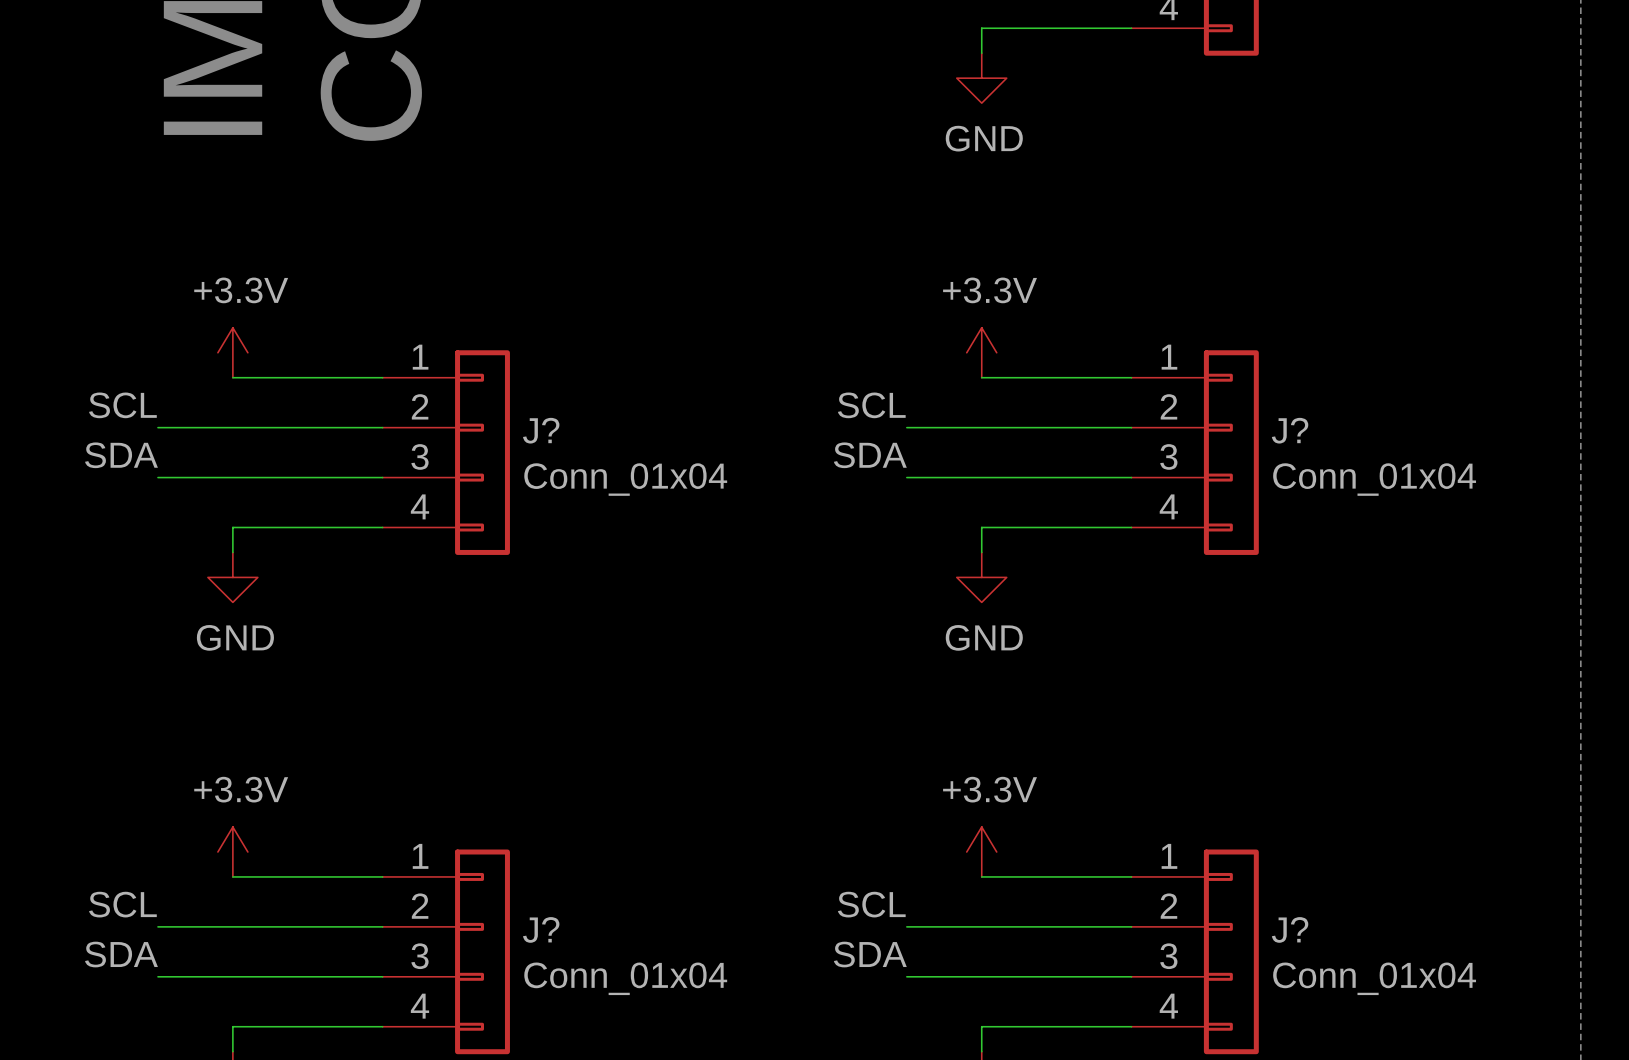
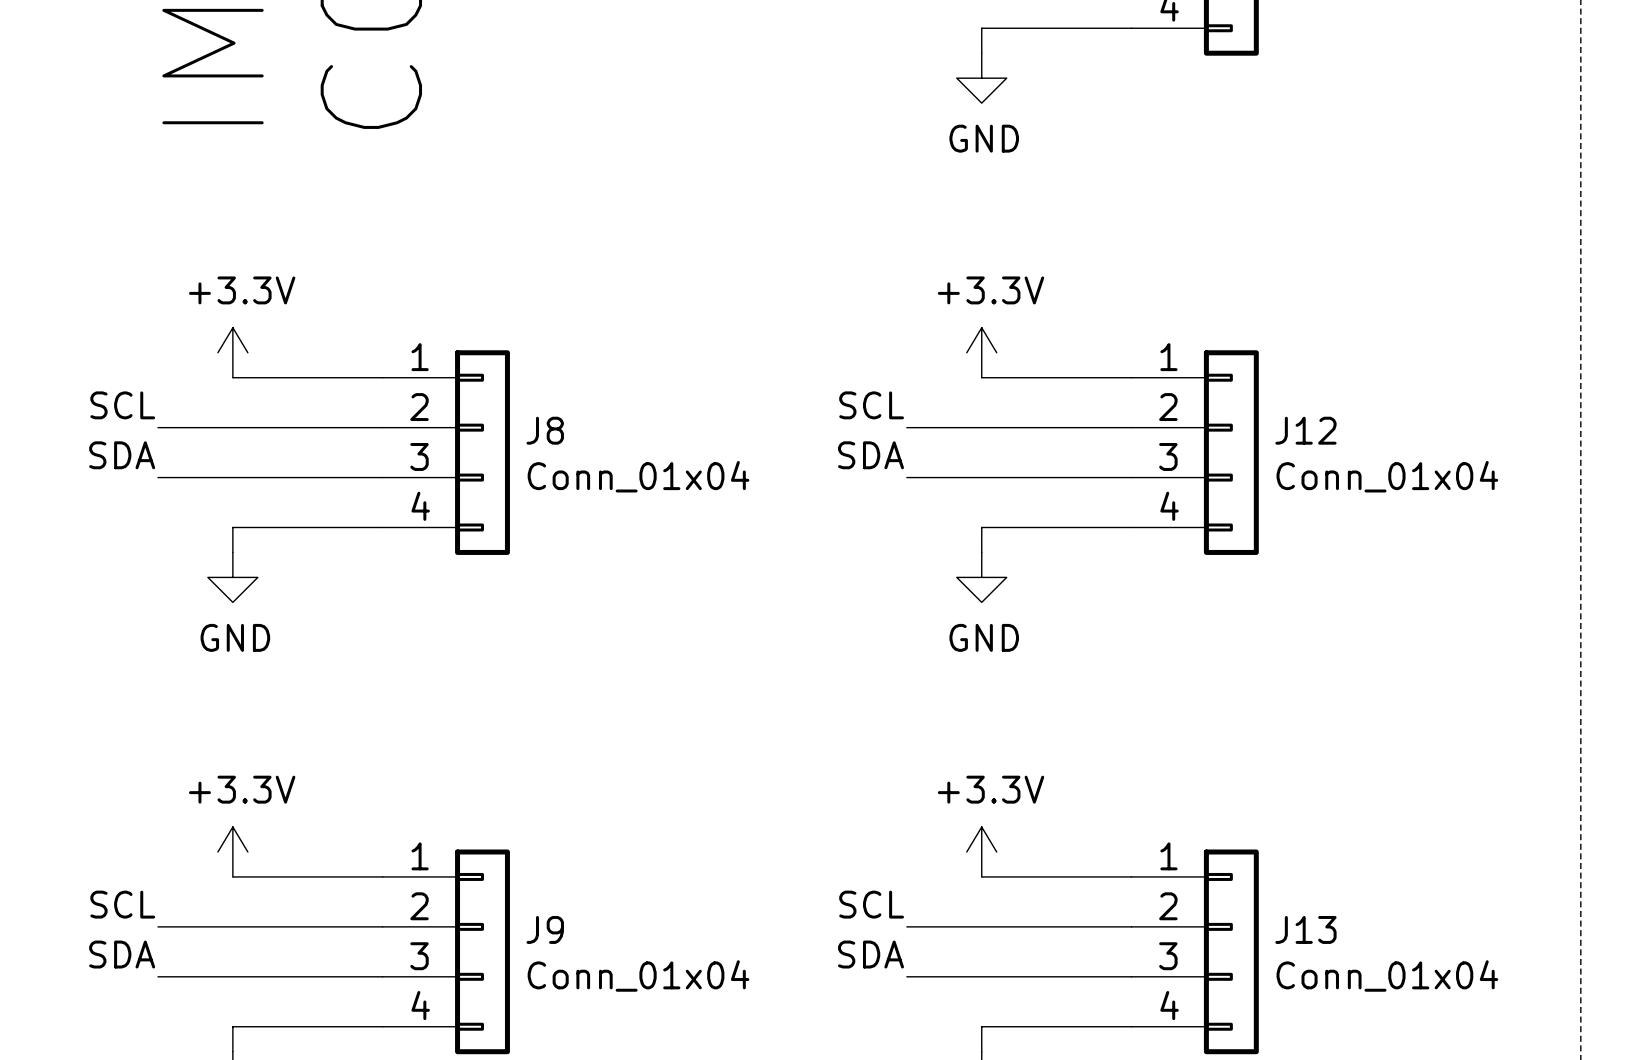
J? name: J? (541, 430) -> J8 (545, 430)
J? name: J? (1290, 430) -> J12 (1305, 430)
J? name: J? (541, 929) -> J9 (545, 929)
J? name: J? (1290, 929) -> J13 (1305, 929)

